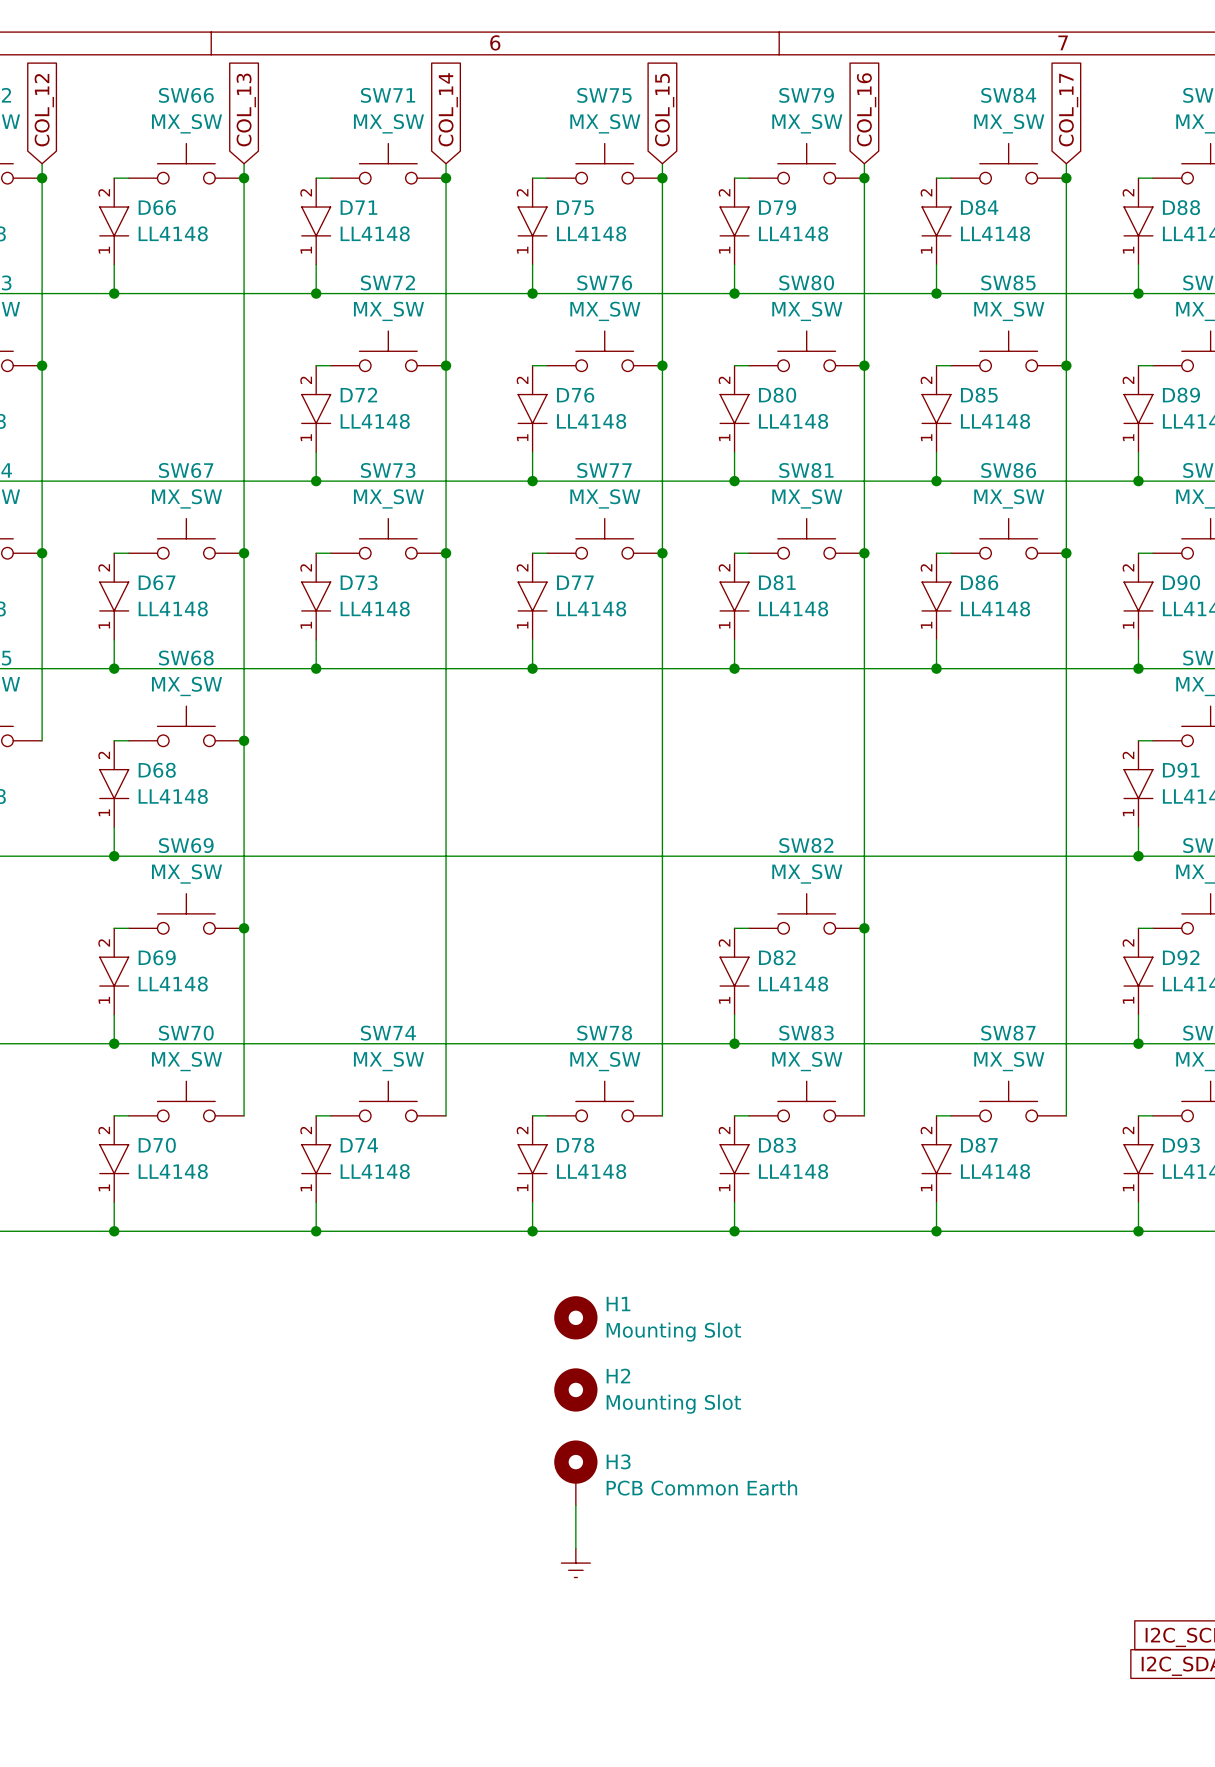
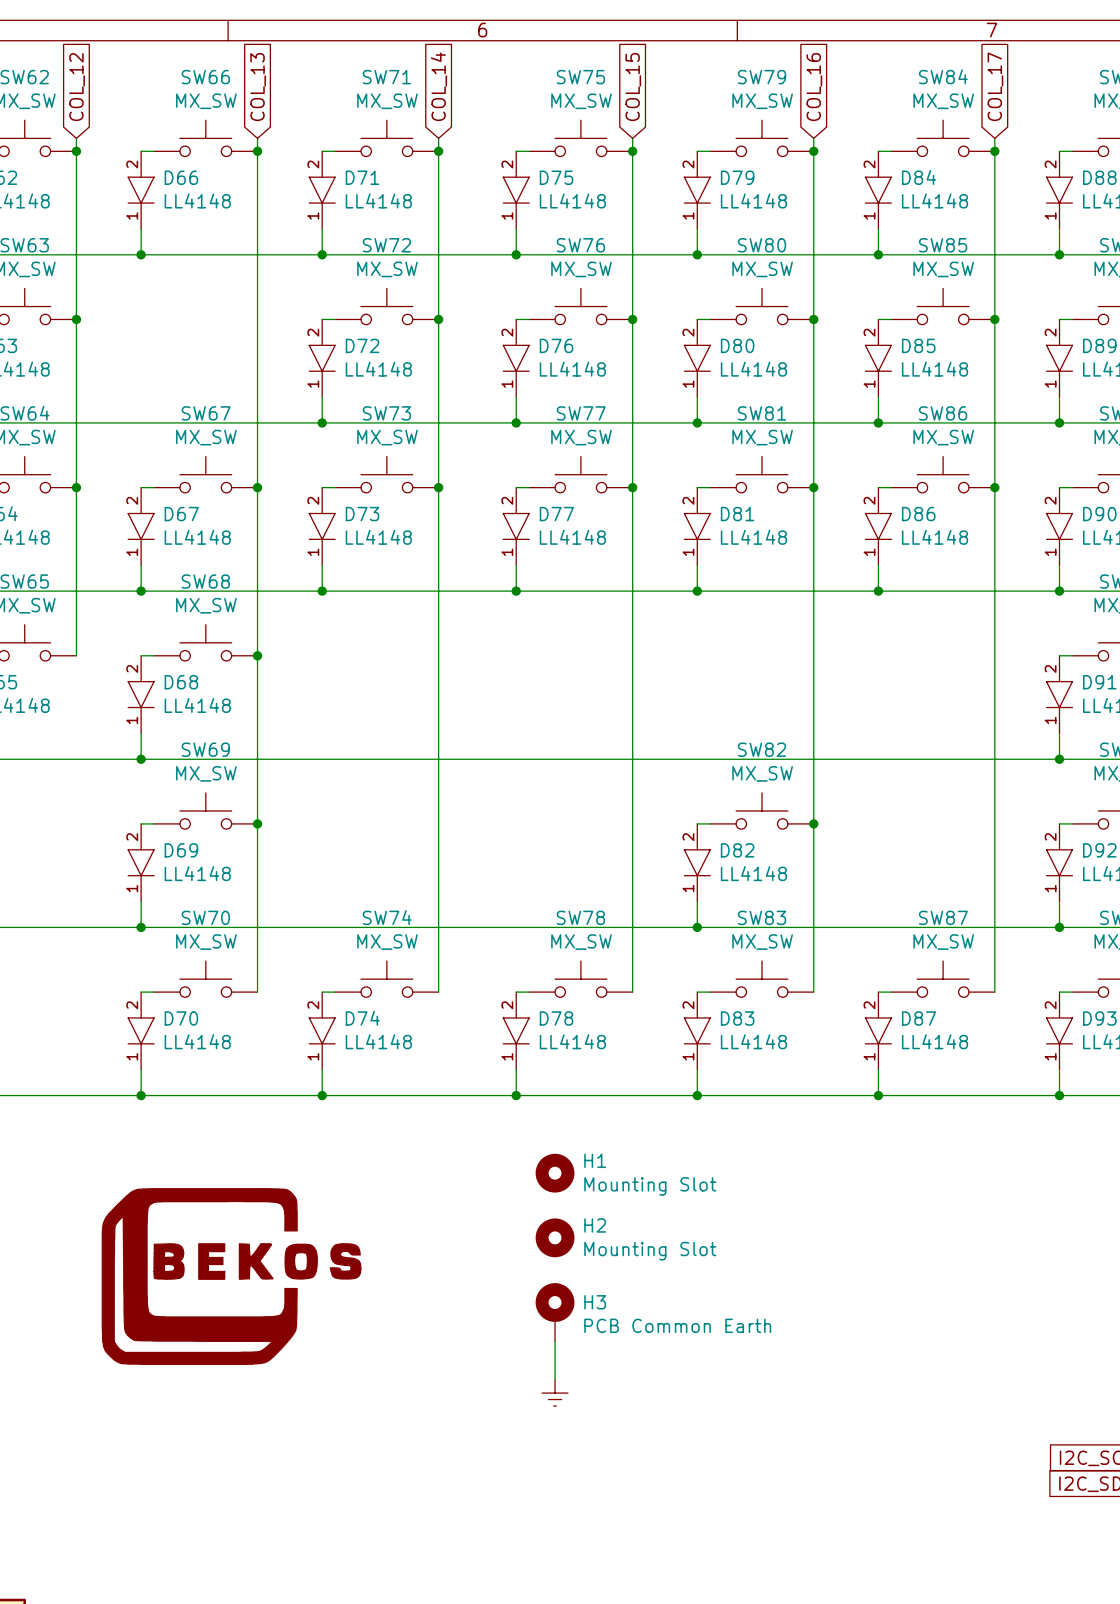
power symbol: none -> (231, 1276)

